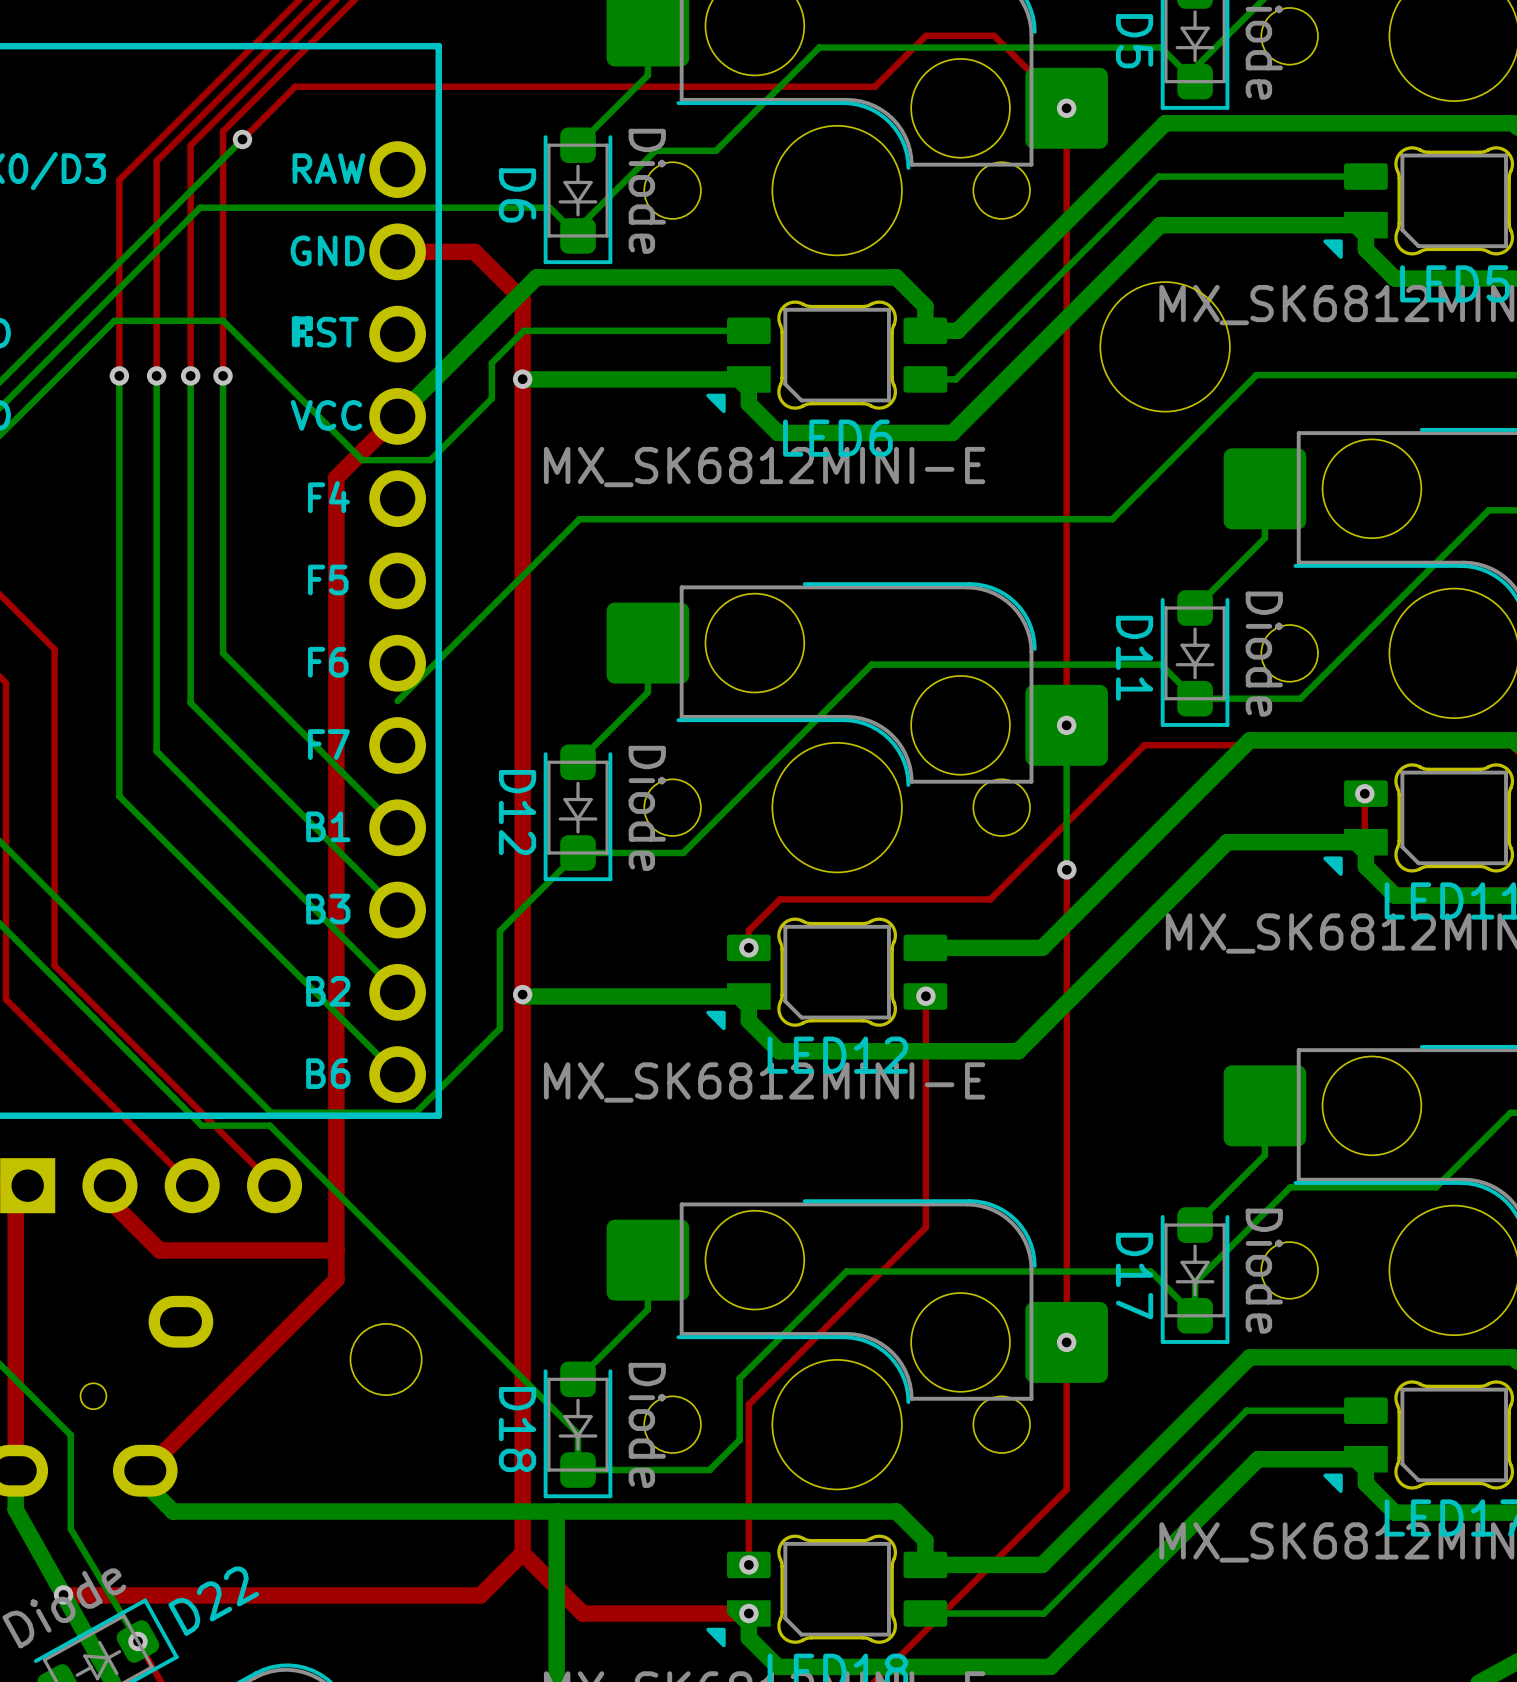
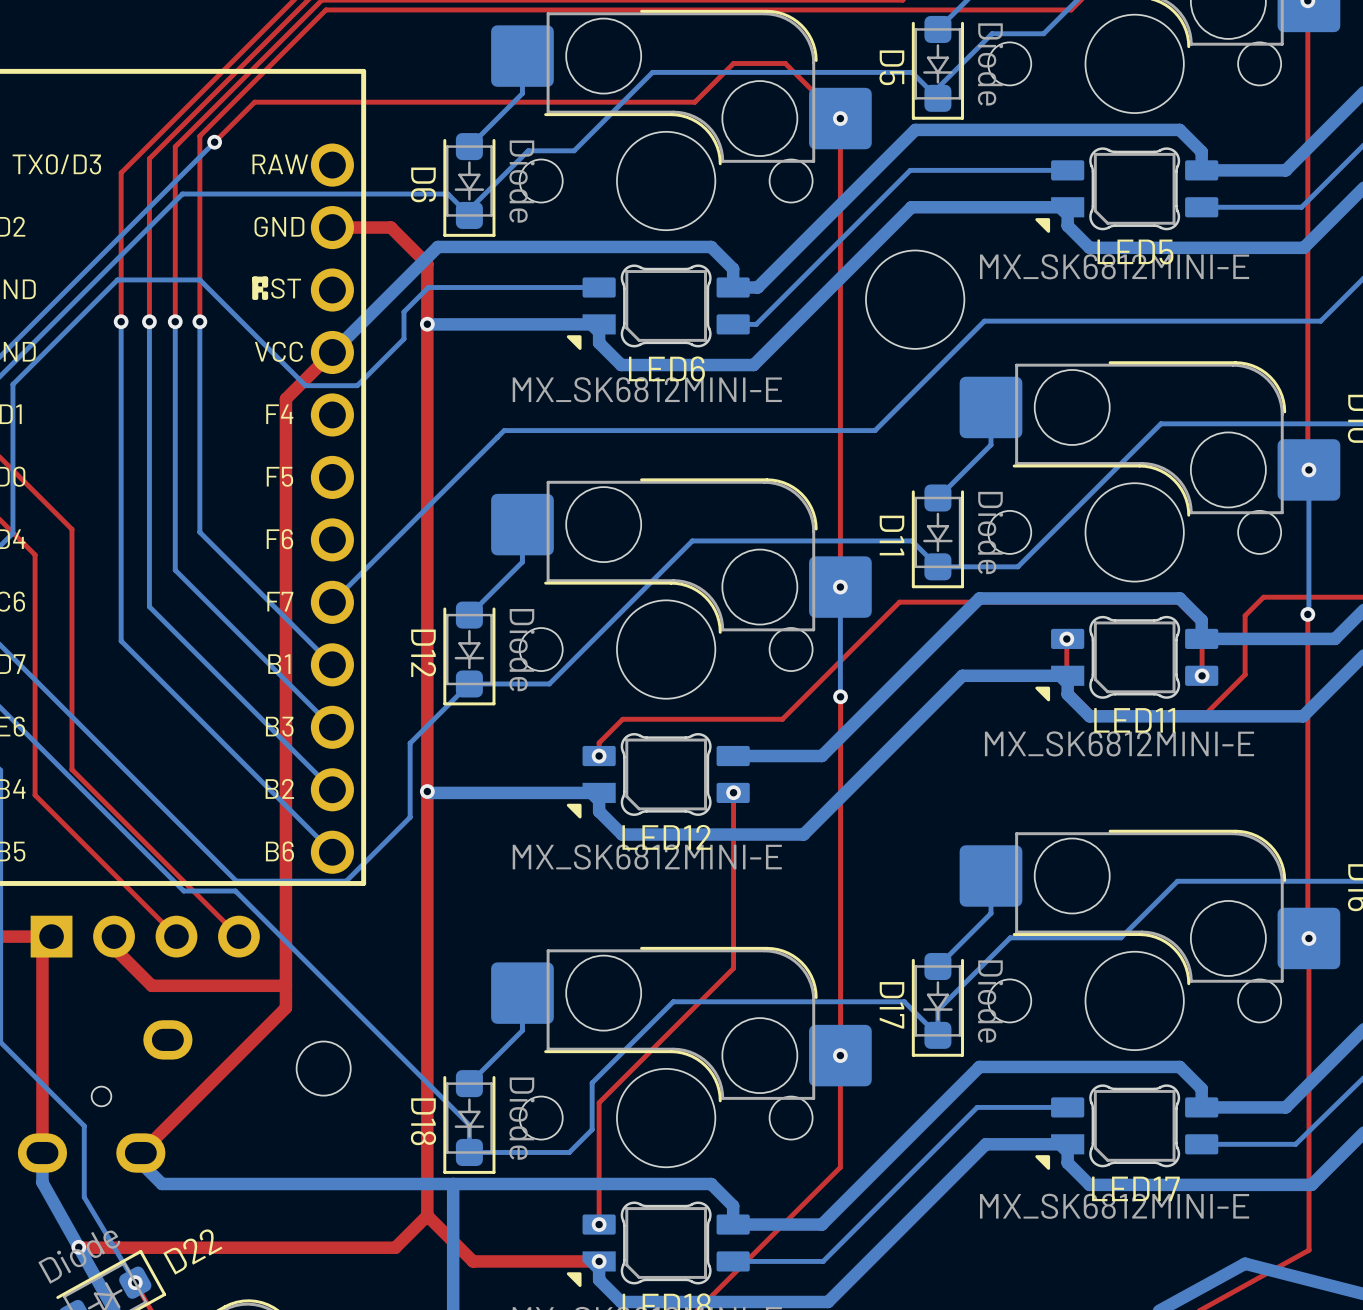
bottom track: (623, 519) (579, 519) (397, 701) -> (504, 430) (332, 602)

